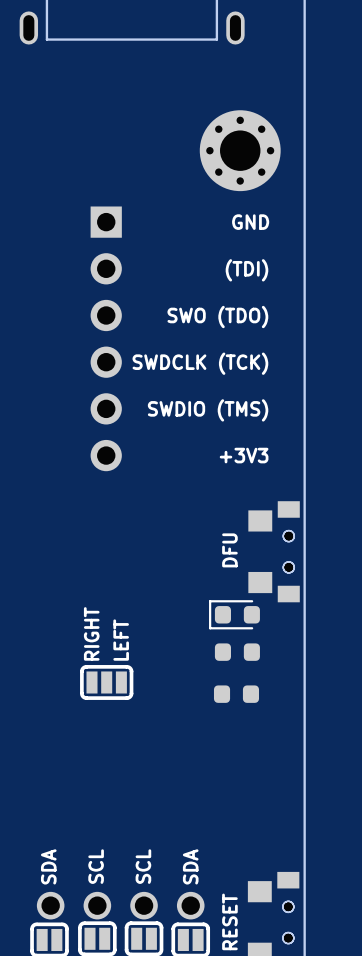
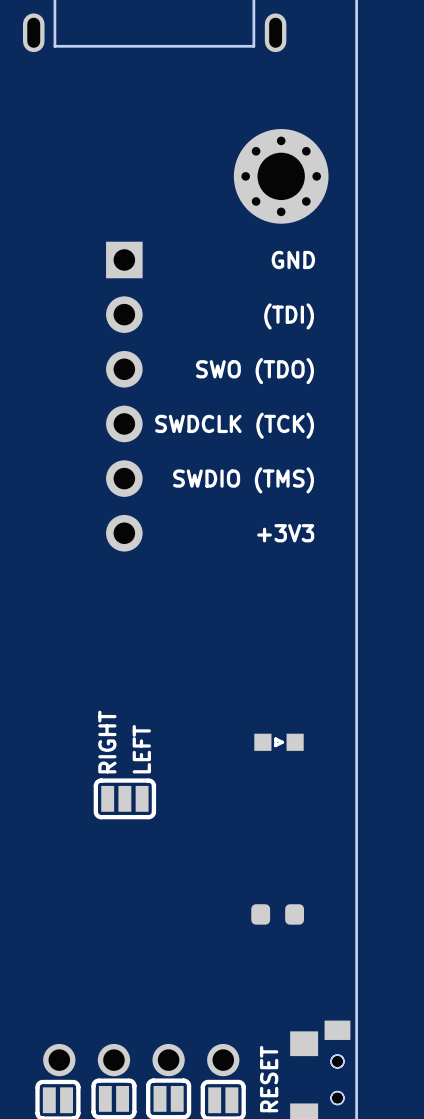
text: DFU (229, 550) -> none
part: (274, 551) -> none
part: (288, 551) -> none
part: (234, 614) -> none
part: none -> (279, 742)
part: (237, 652) -> none
part: (236, 694) -> none
part: none -> (277, 914)
text: SDA (48, 866) -> none
text: SCL (96, 866) -> none
text: SCL (143, 866) -> none
text: SDA (190, 866) -> none

